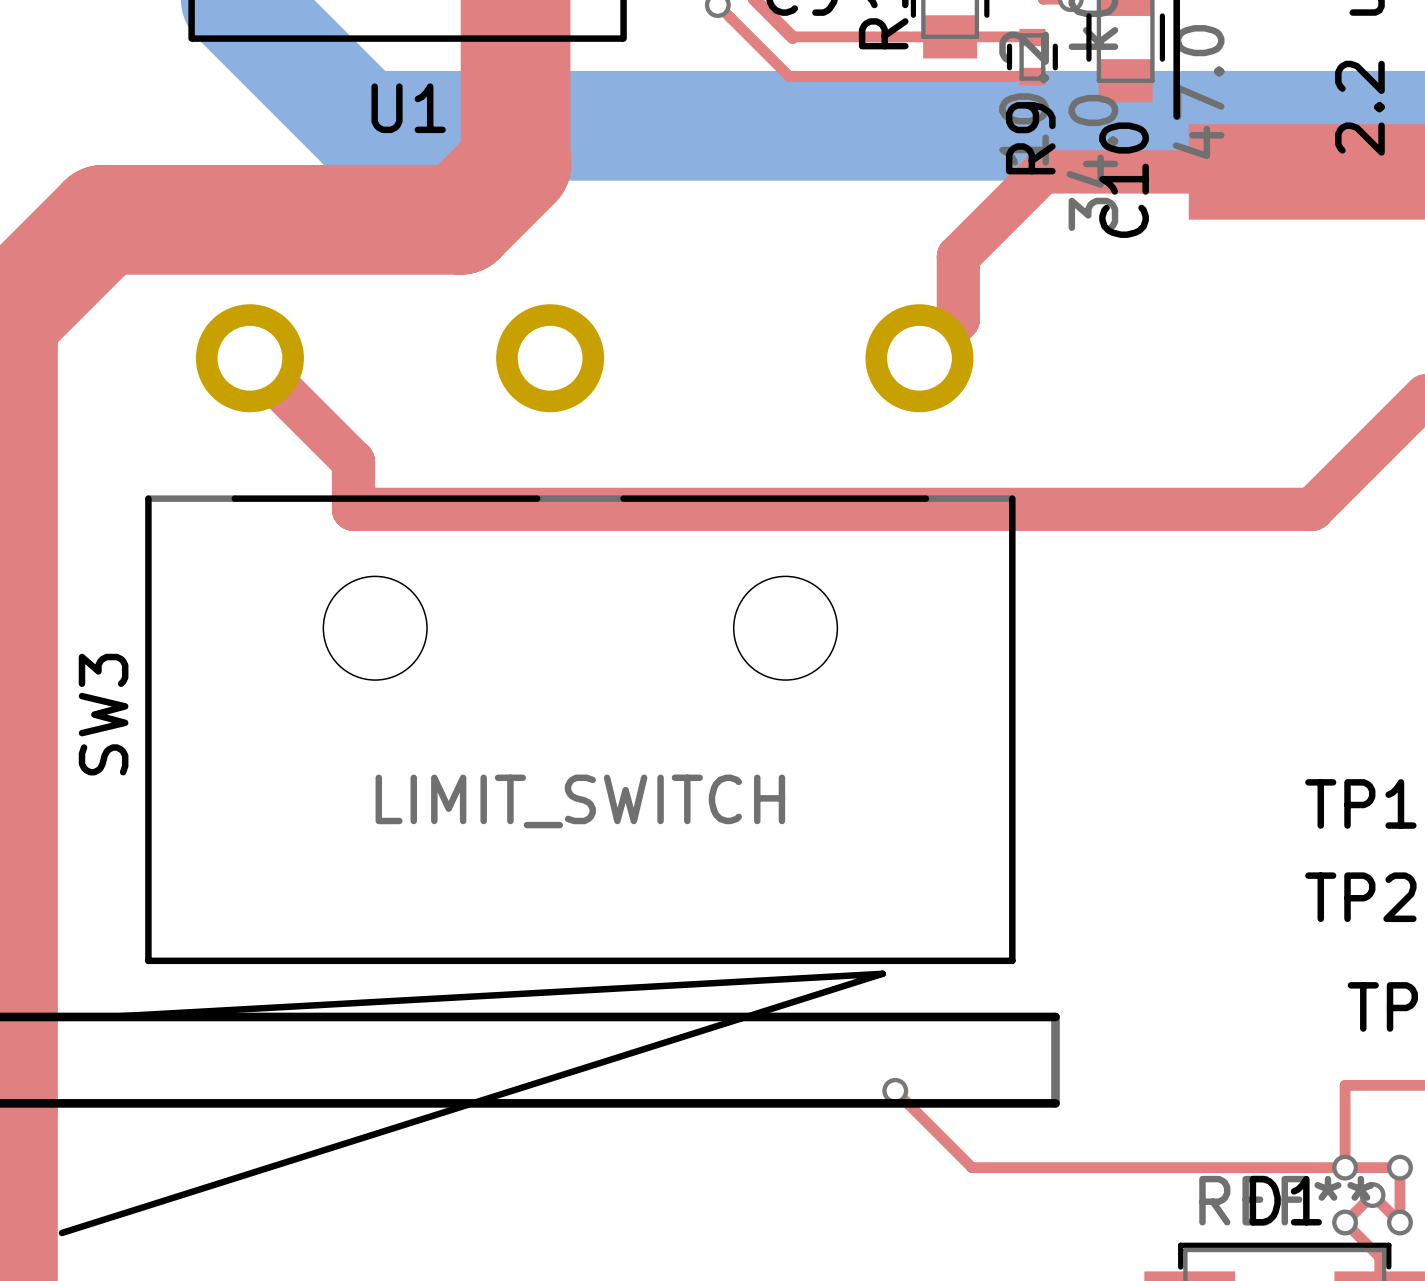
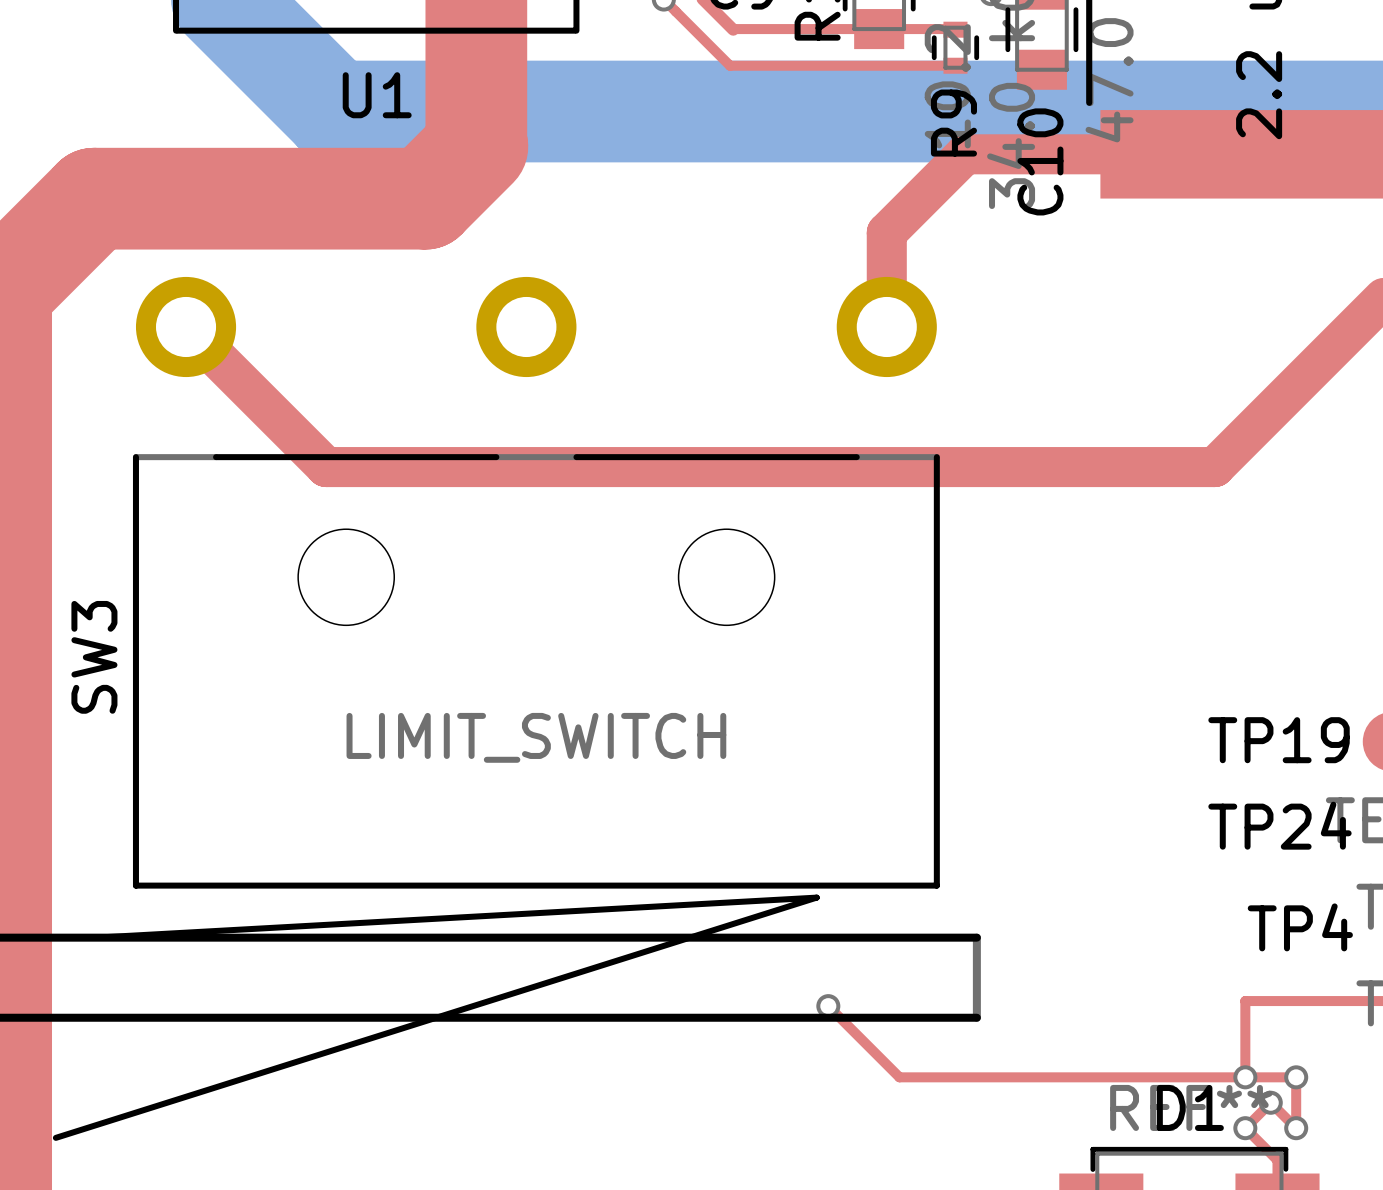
SW3 footprint: [58, 304, 1016, 1237] -> [52, 276, 940, 1141]
top track: (249, 358) (353, 461) (353, 509) -> (186, 326) (326, 467)

